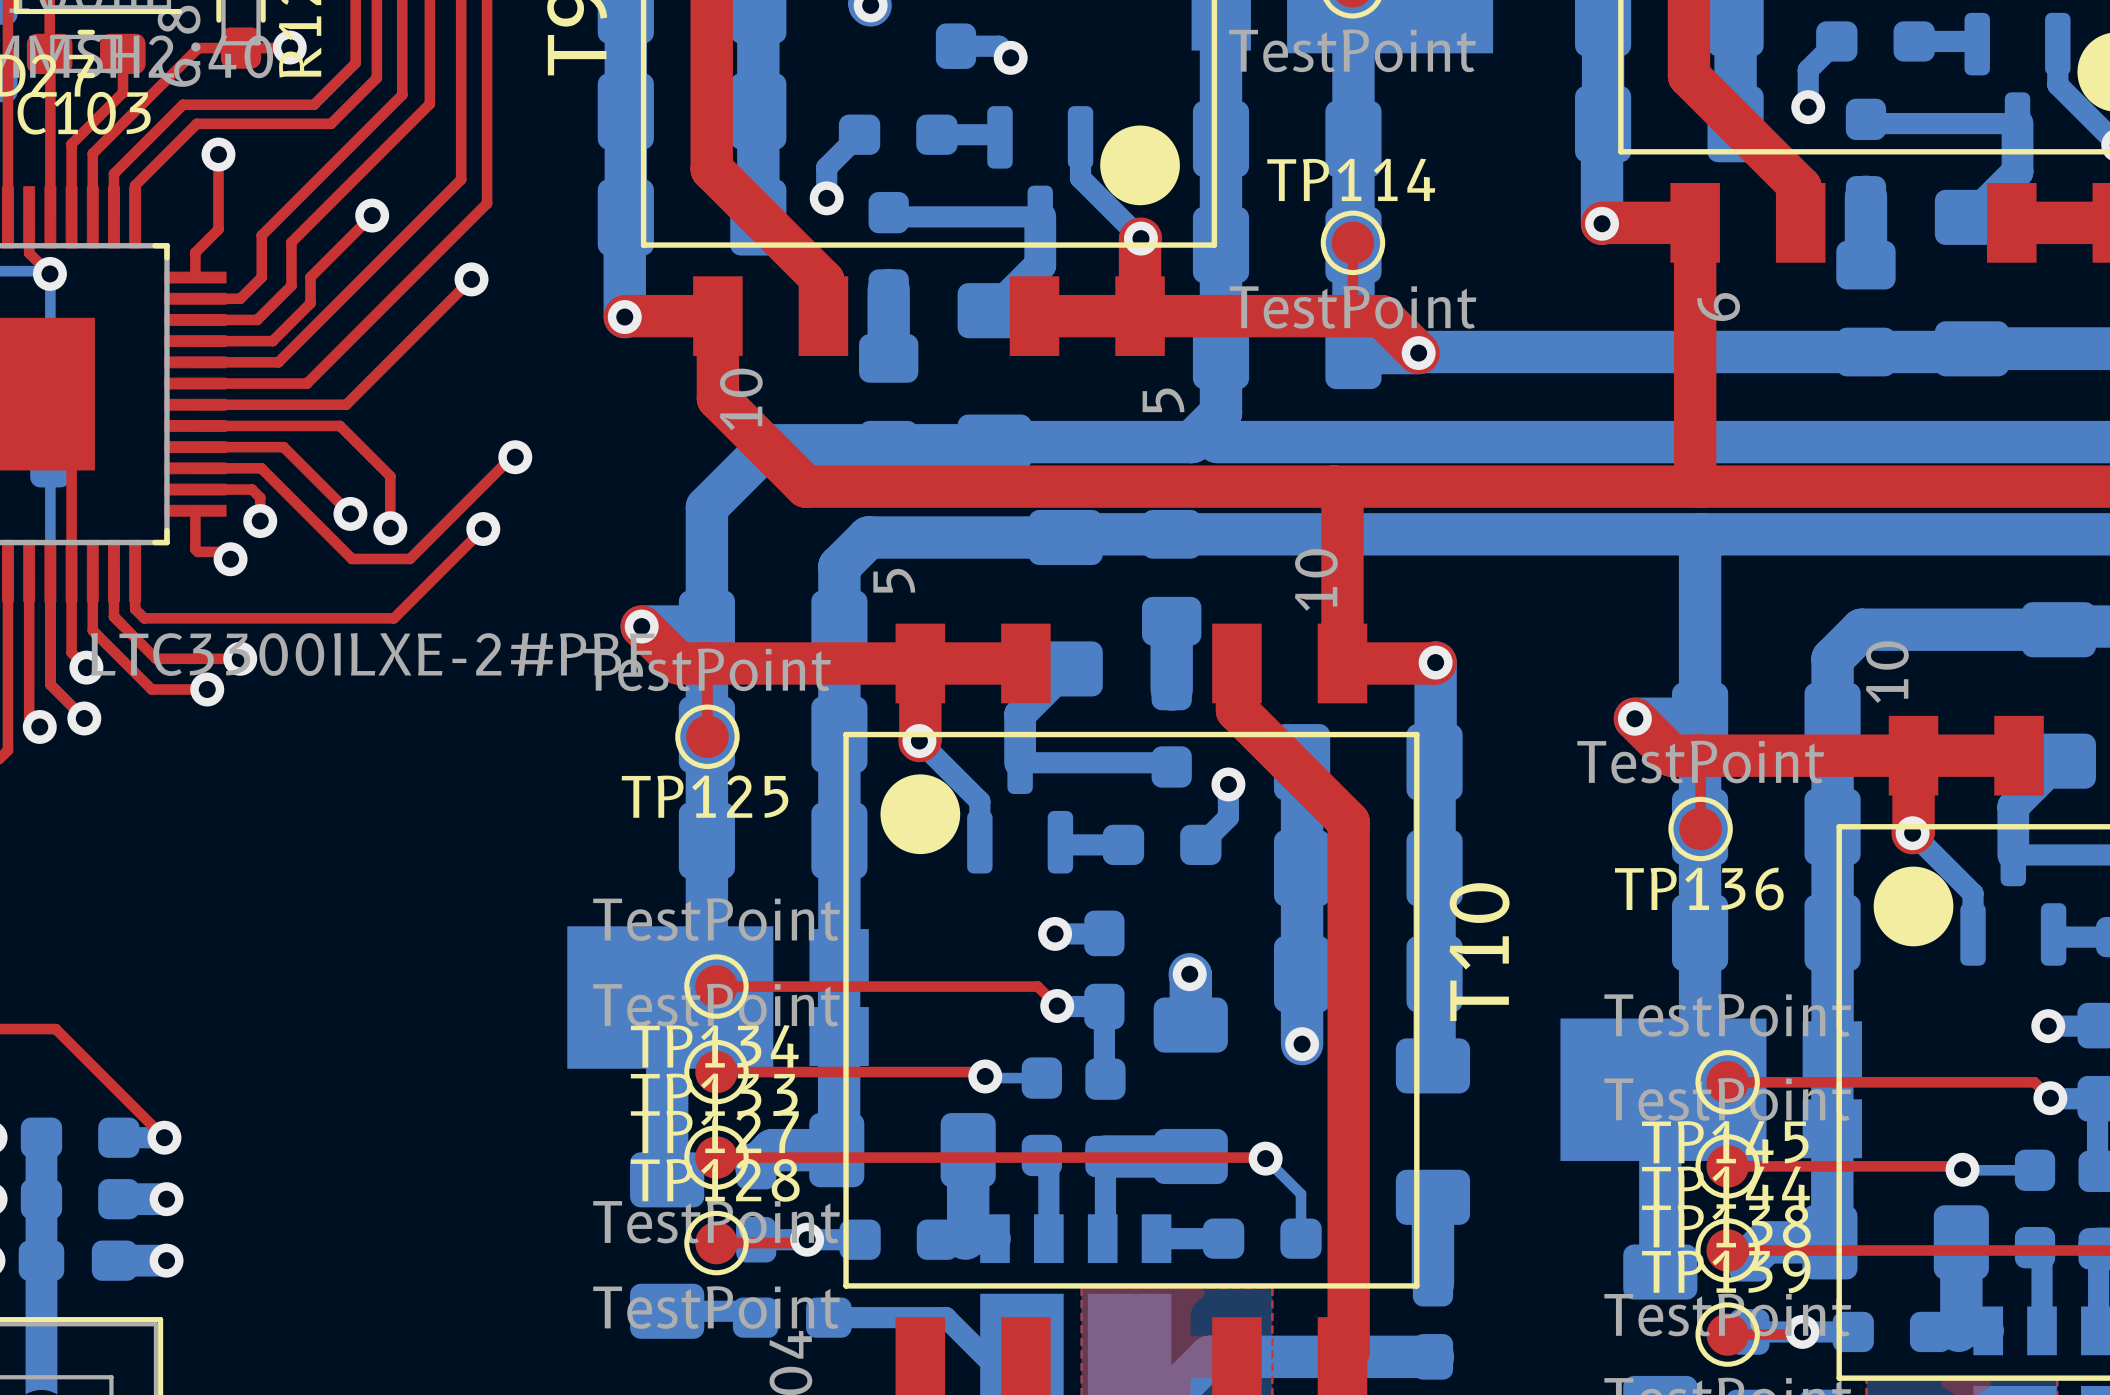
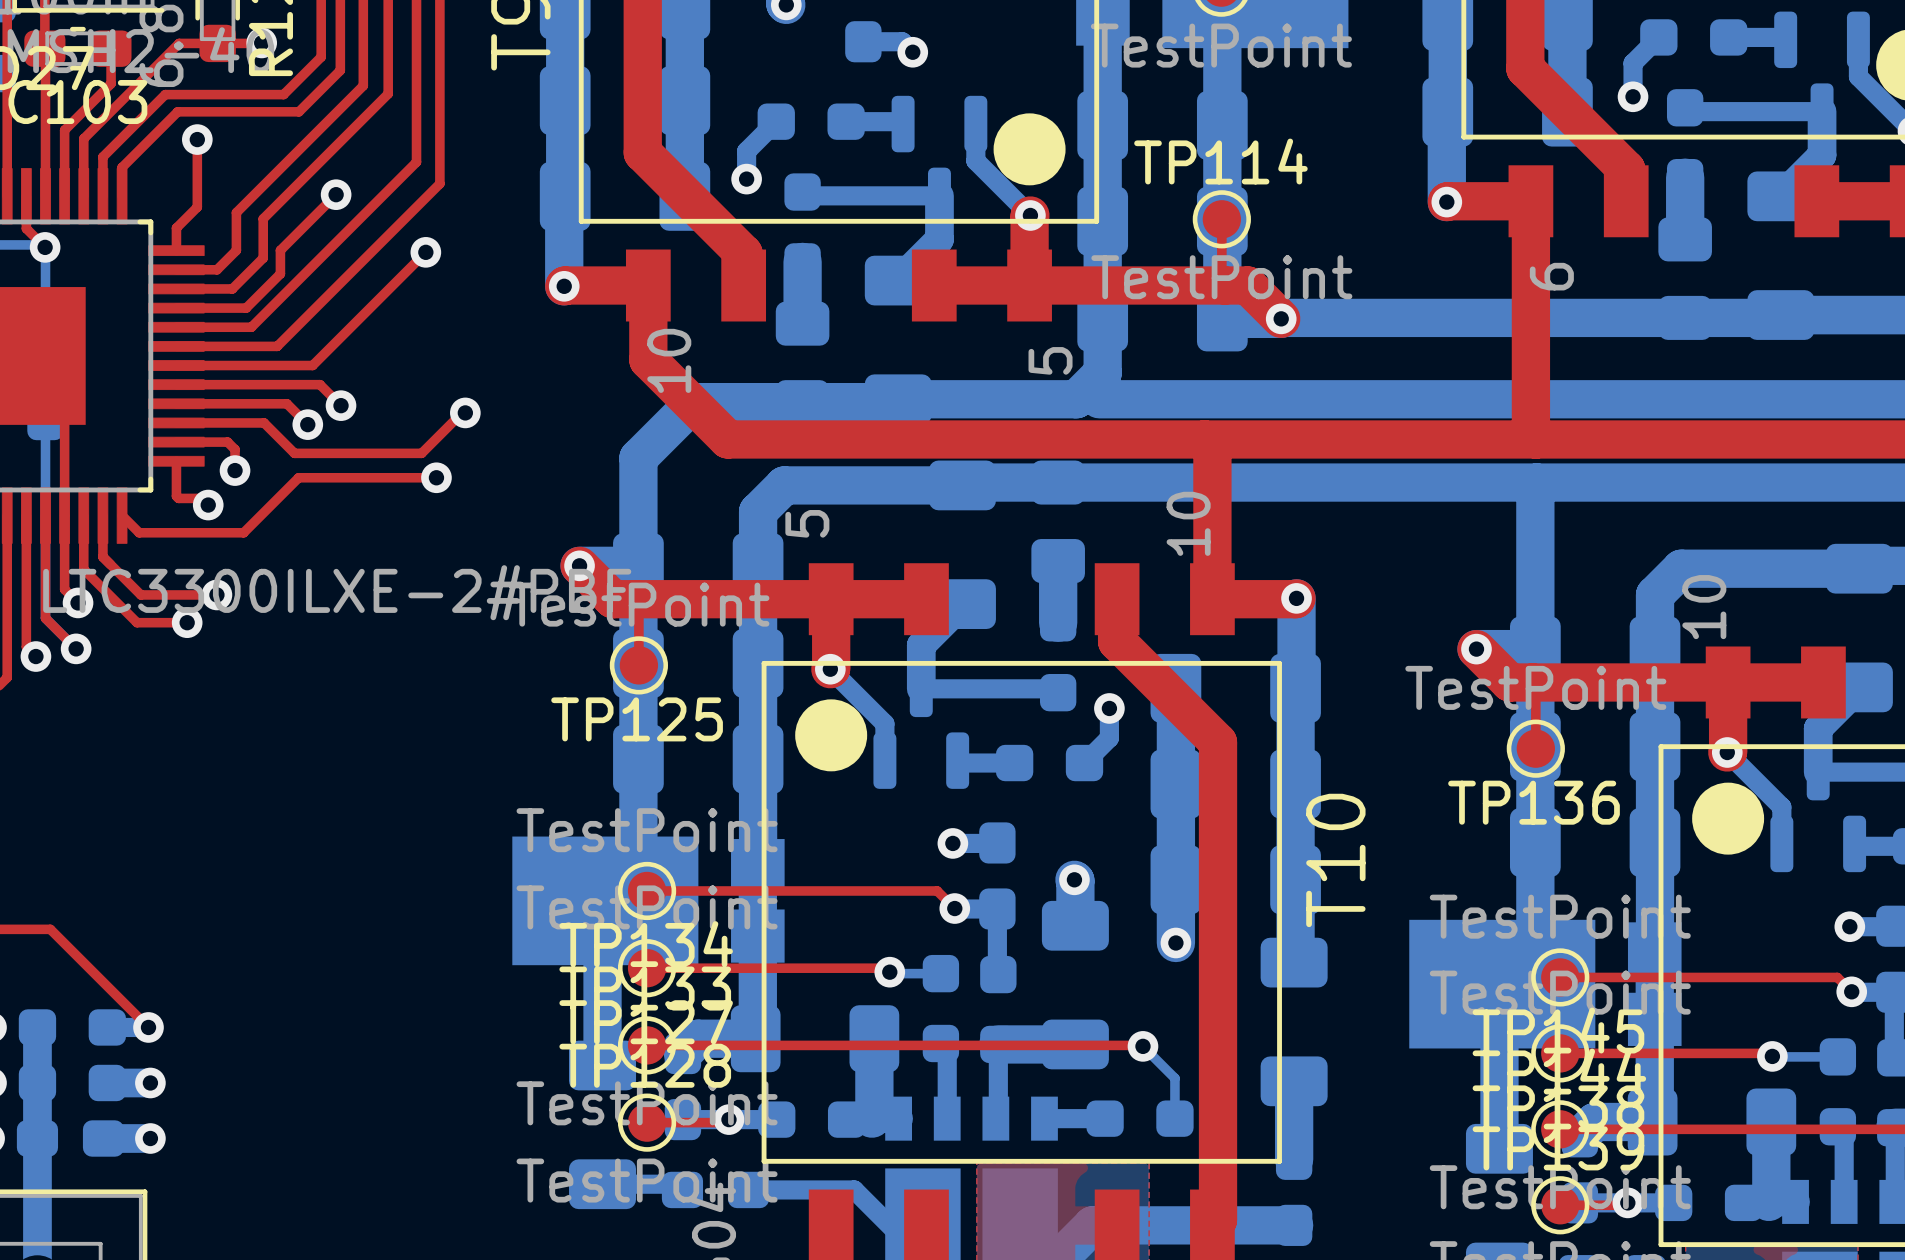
top track: (339, 425) (390, 476) (390, 528) -> (307, 384) (320, 384) (341, 405)
top track: (283, 447) (350, 513) -> (256, 403) (286, 403) (307, 424)
via: none -> (341, 405)
top track: (261, 468) (352, 558) (409, 558) (466, 501) -> (236, 422) (264, 422) (294, 453) (421, 453)
via: none -> (307, 424)
via: (350, 513) -> none
via: (390, 528) -> none
top track: (483, 529) (393, 618) (144, 618) (135, 609) (135, 570) -> (436, 477) (298, 477) (243, 532) (139, 532) (122, 515)

